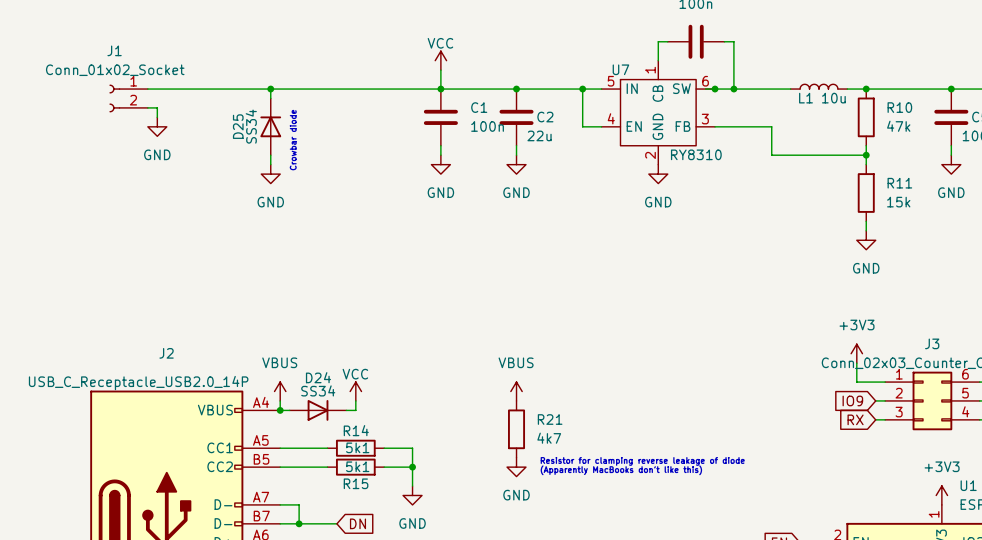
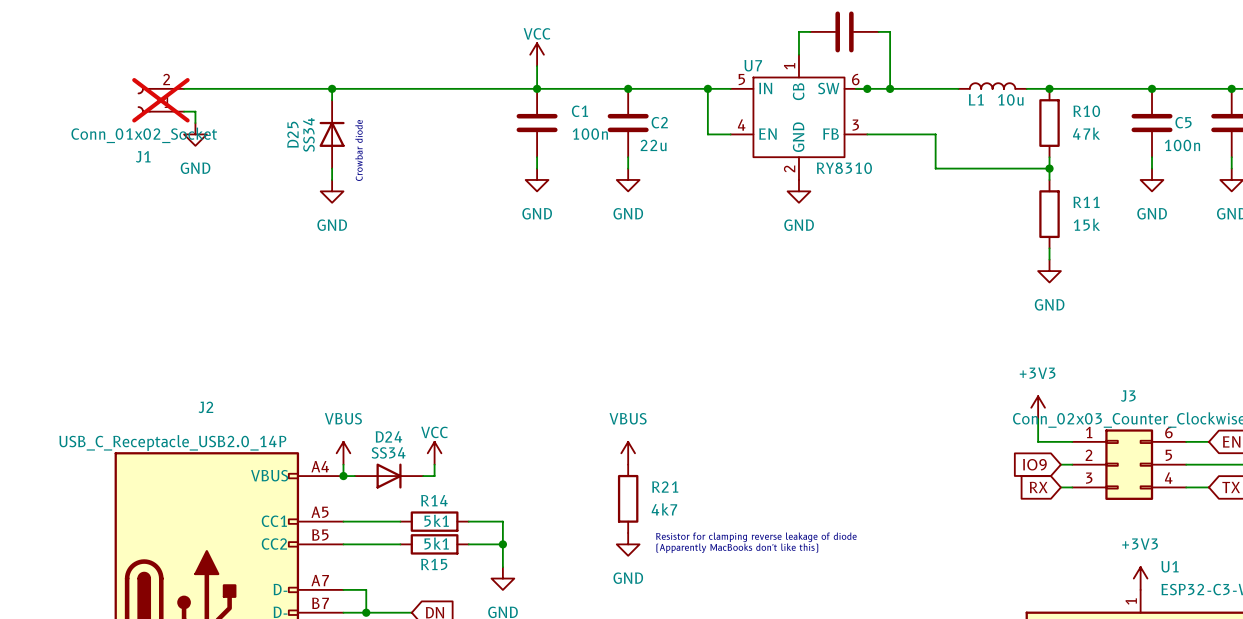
J1 flip: as is (114, 98) -> up-down (144, 100)
J1 do-not-place cross: none -> (160, 100)

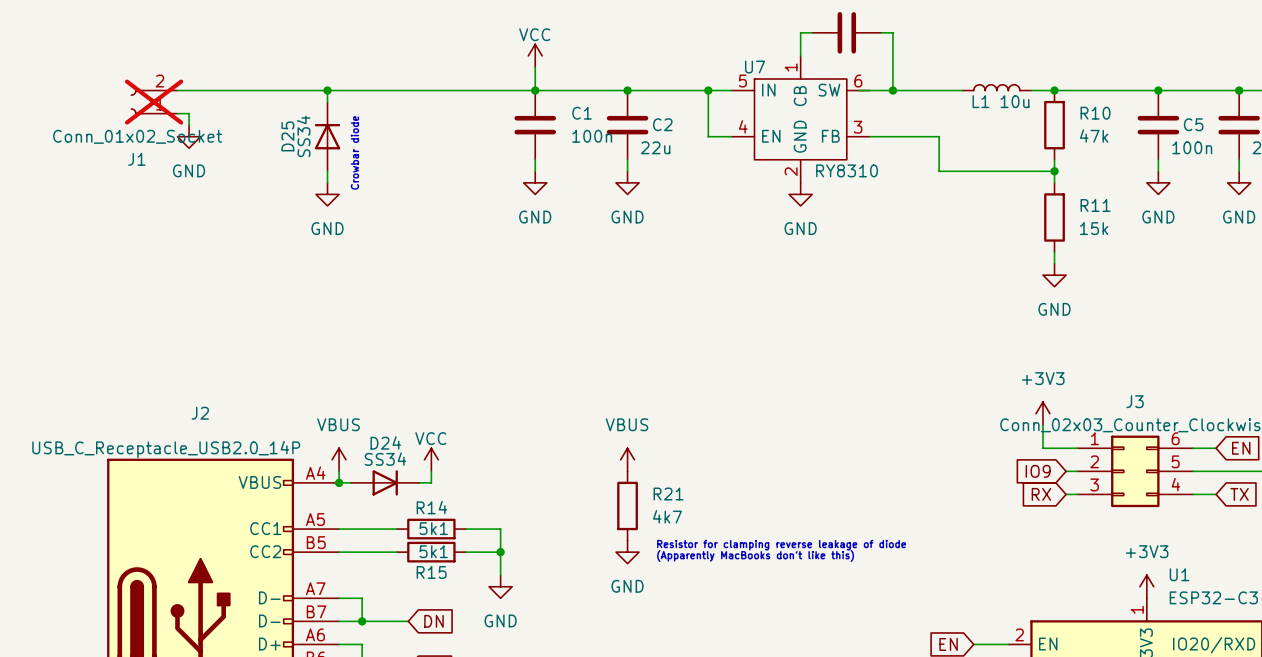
junction: (867, 88) -> none

